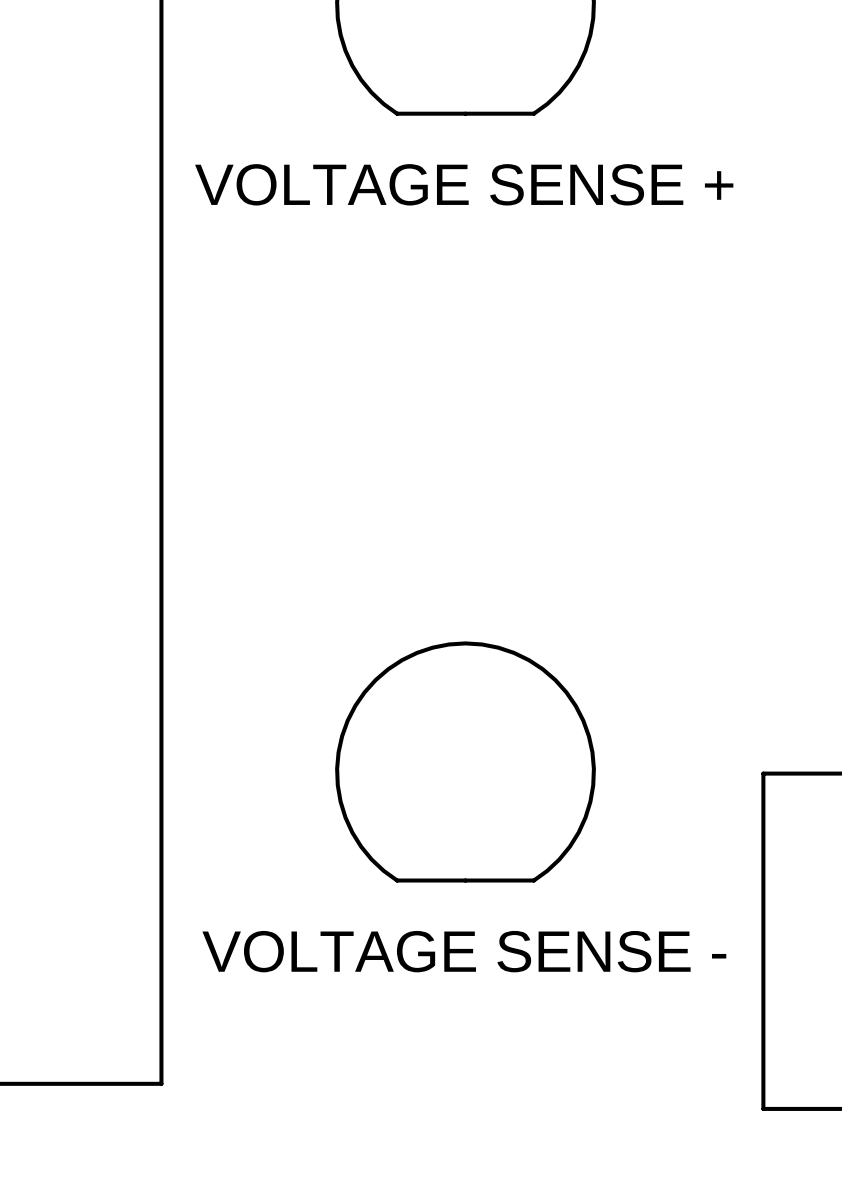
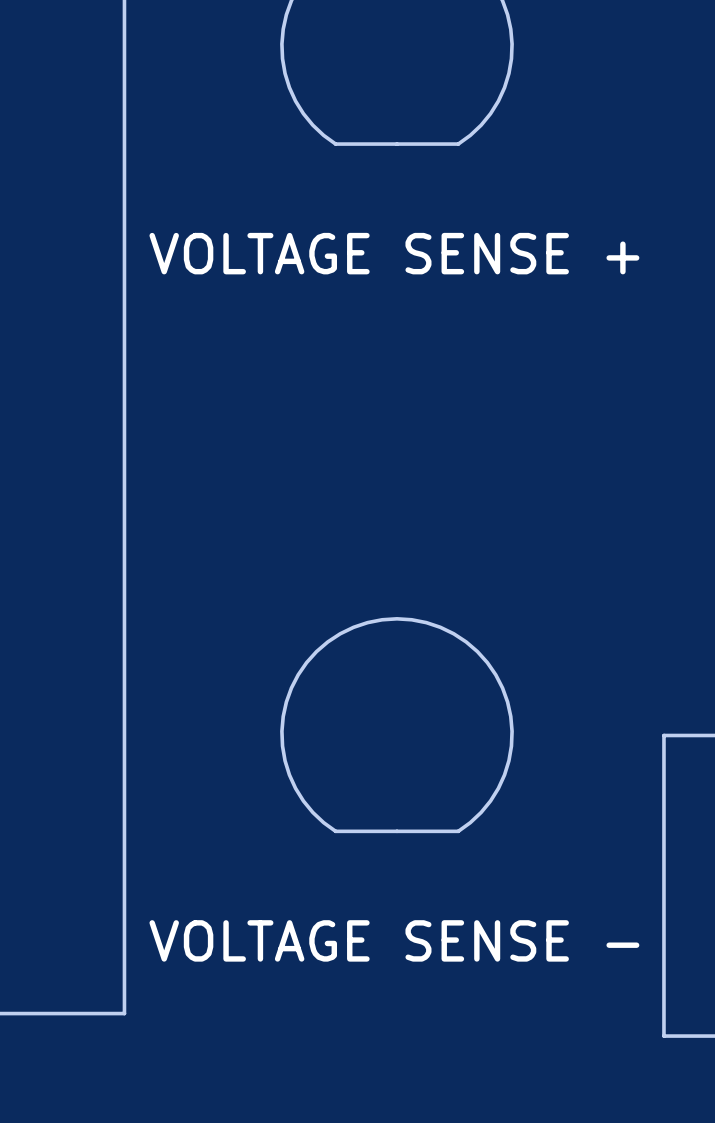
text position: VOLTAGE SENSE + (464, 184) -> VOLTAGE SENSE + (394, 253)
text position: VOLTAGE SENSE - (464, 951) -> VOLTAGE SENSE - (394, 940)

